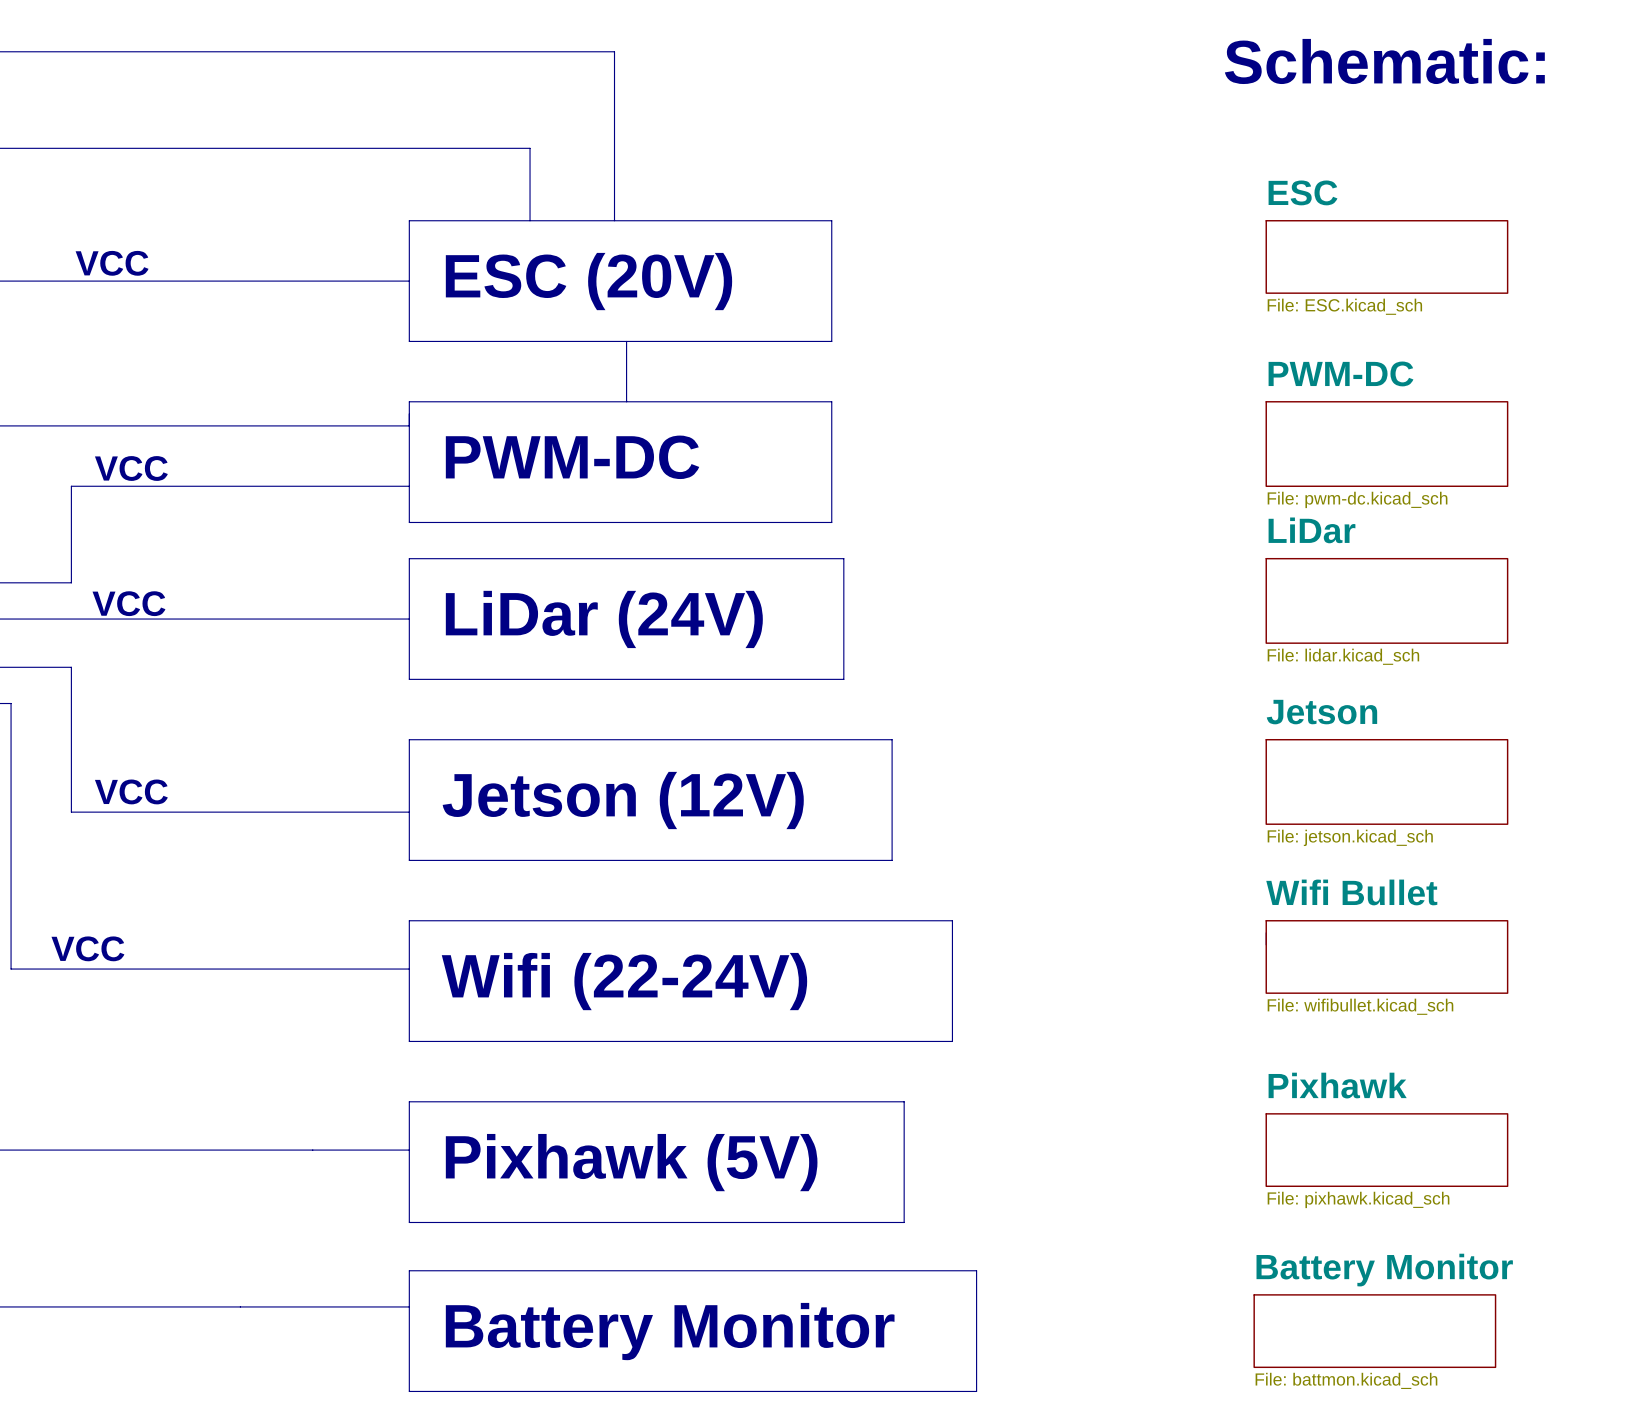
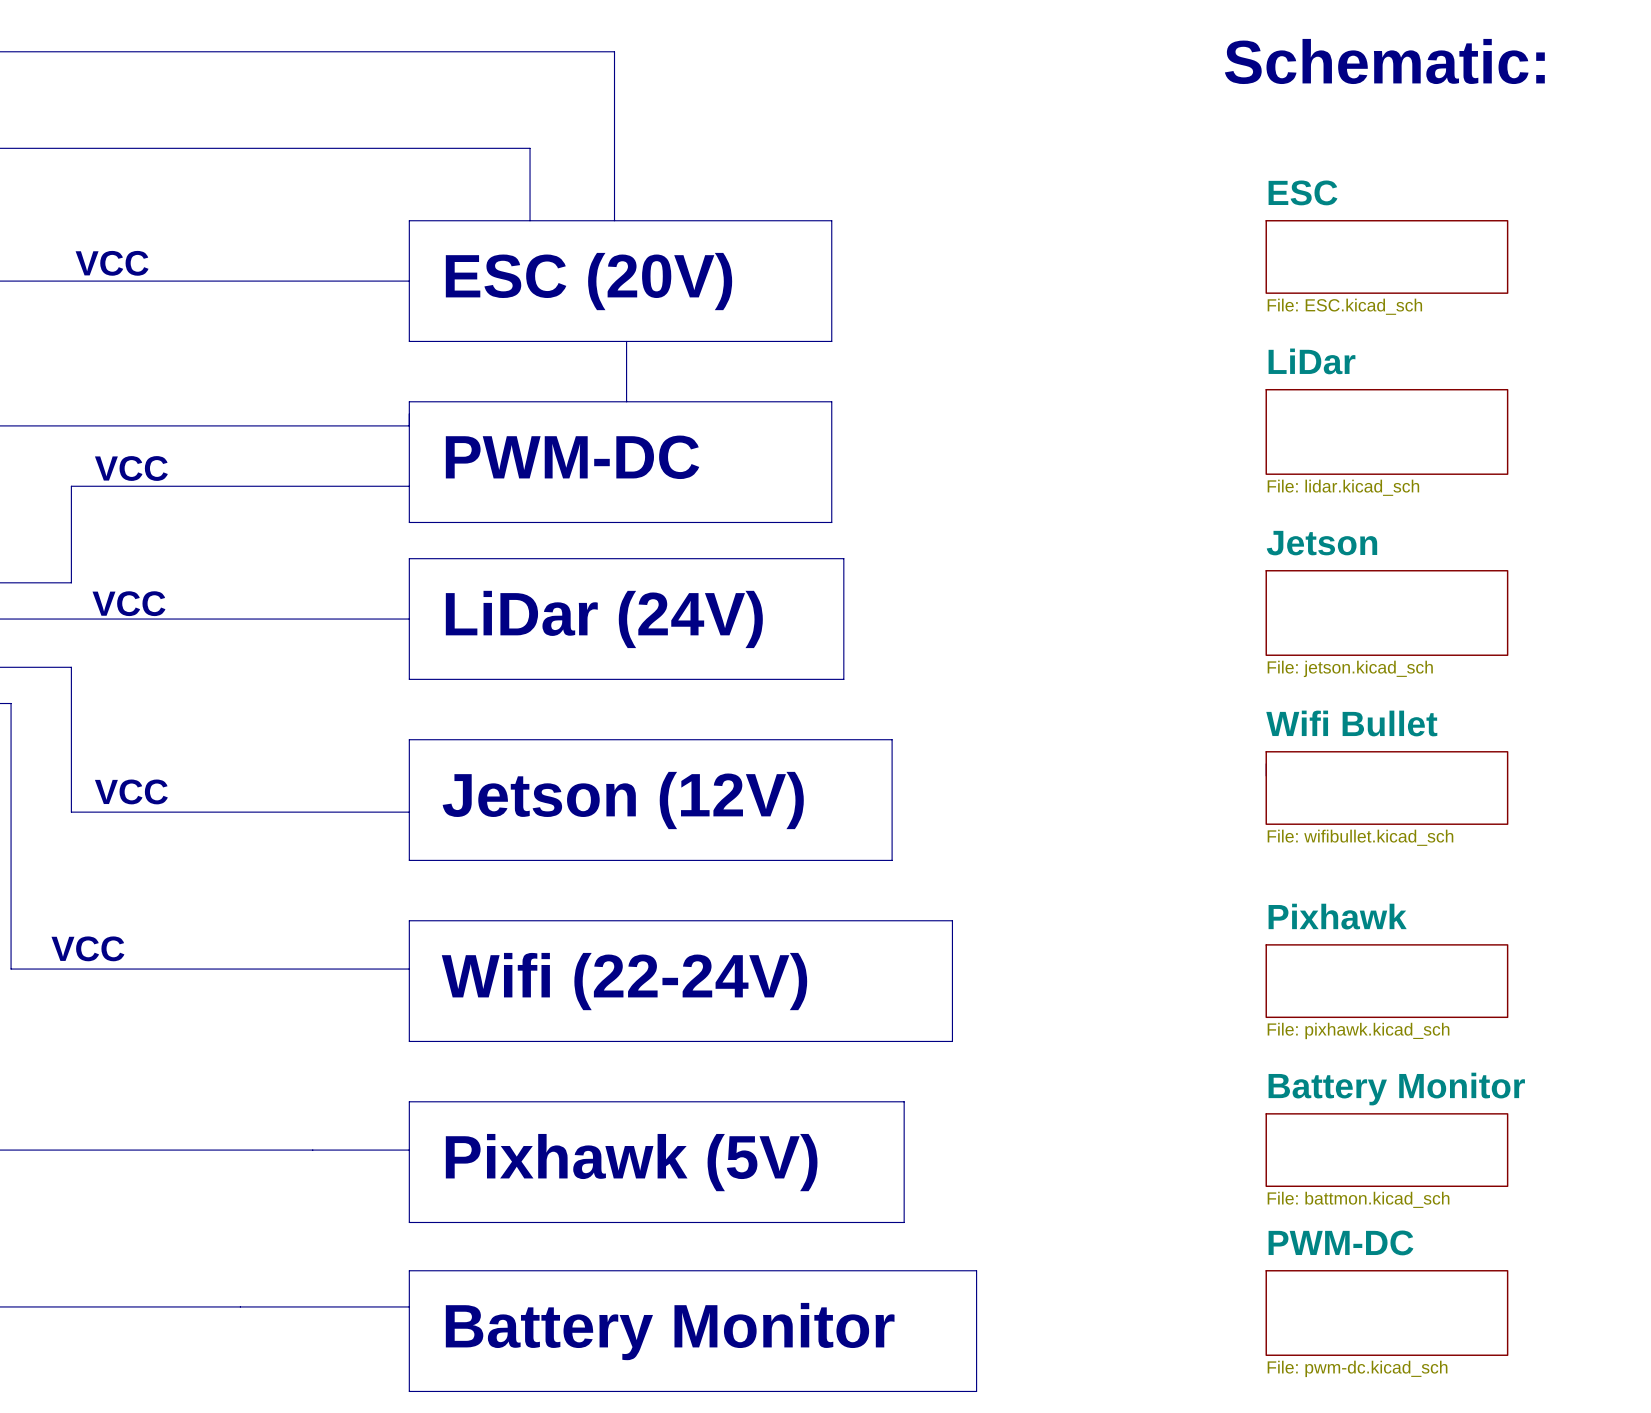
sheet PWM-DC: File: pwm-dc.kicad_sch (1386, 444) -> none
sheet LiDar position: (1386, 600) -> (1386, 431)
sheet Jetson position: (1386, 781) -> (1386, 612)
sheet Wifi Bullet position: (1386, 956) -> (1386, 787)
sheet Pixhawk: none -> File: pixhawk.kicad_sch (1386, 981)
sheet Pixhawk name: Pixhawk (1337, 1085) -> Battery Monitor (1396, 1089)
sheet Pixhawk value: File: pixhawk.kicad_sch (1358, 1199) -> File: battmon.kicad_sch (1358, 1199)
sheet PWM-DC: none -> File: pwm-dc.kicad_sch (1386, 1313)
sheet Battery Monitor: File: battmon.kicad_sch (1374, 1331) -> none

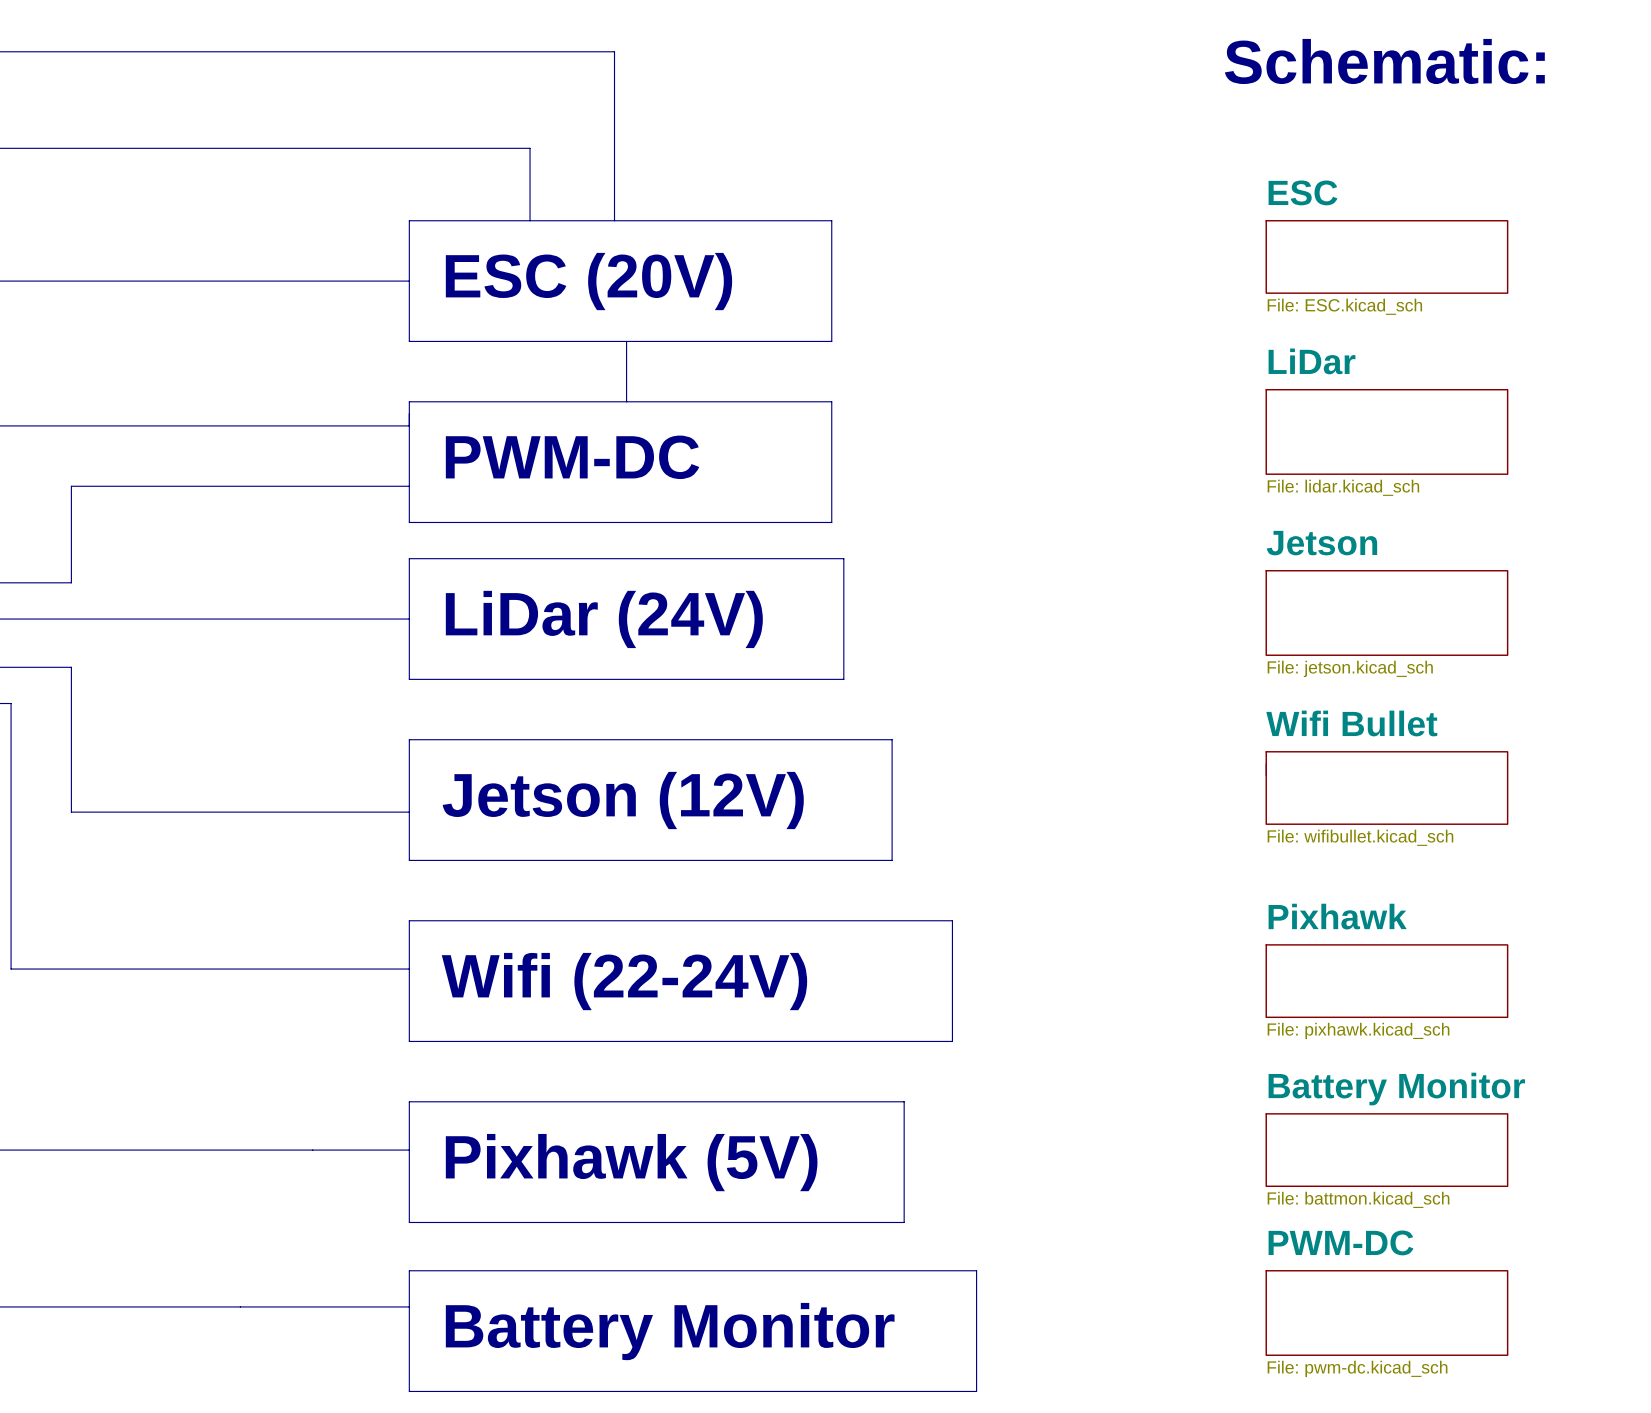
text: VCC (112, 263) -> none
text: VCC (131, 468) -> none
text: VCC (128, 603) -> none
text: VCC (131, 791) -> none
text: VCC (87, 948) -> none

